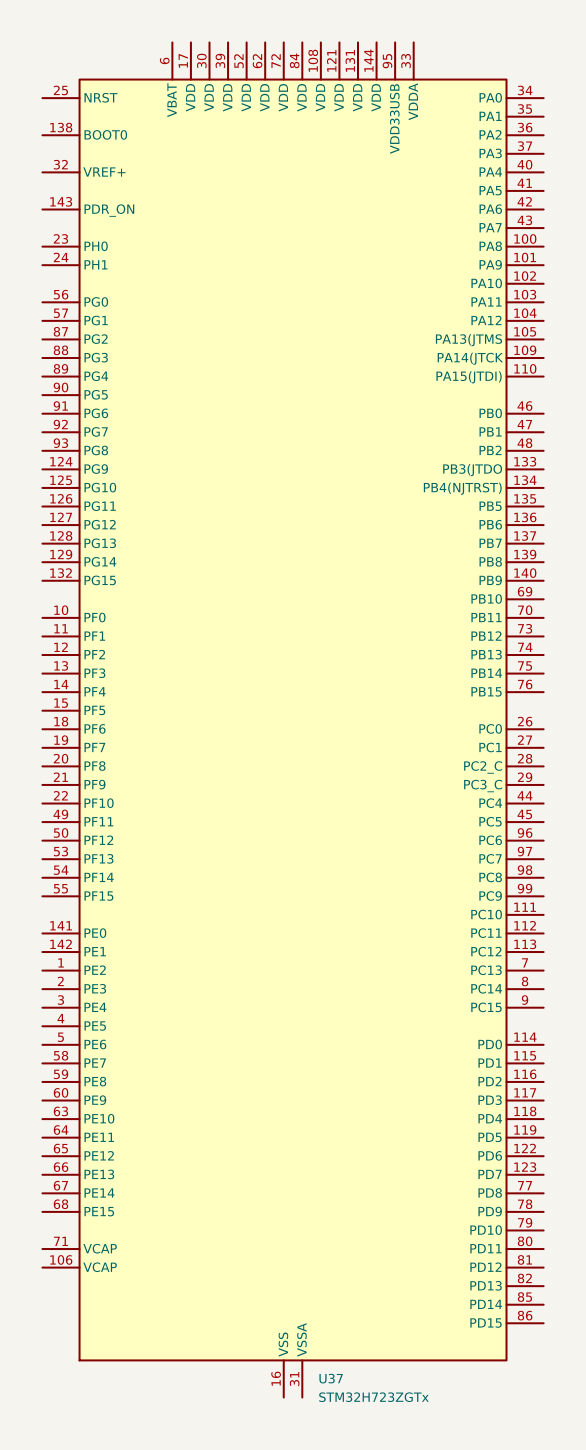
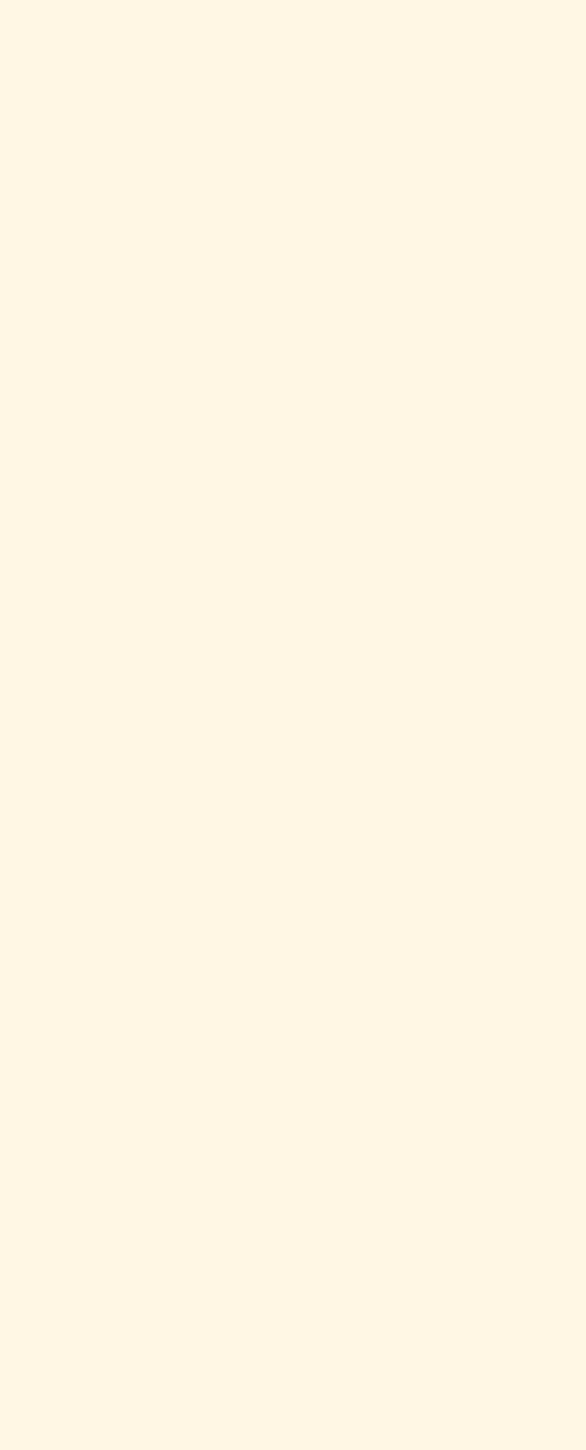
U37: STM32H723ZGTx (293, 719) -> none

